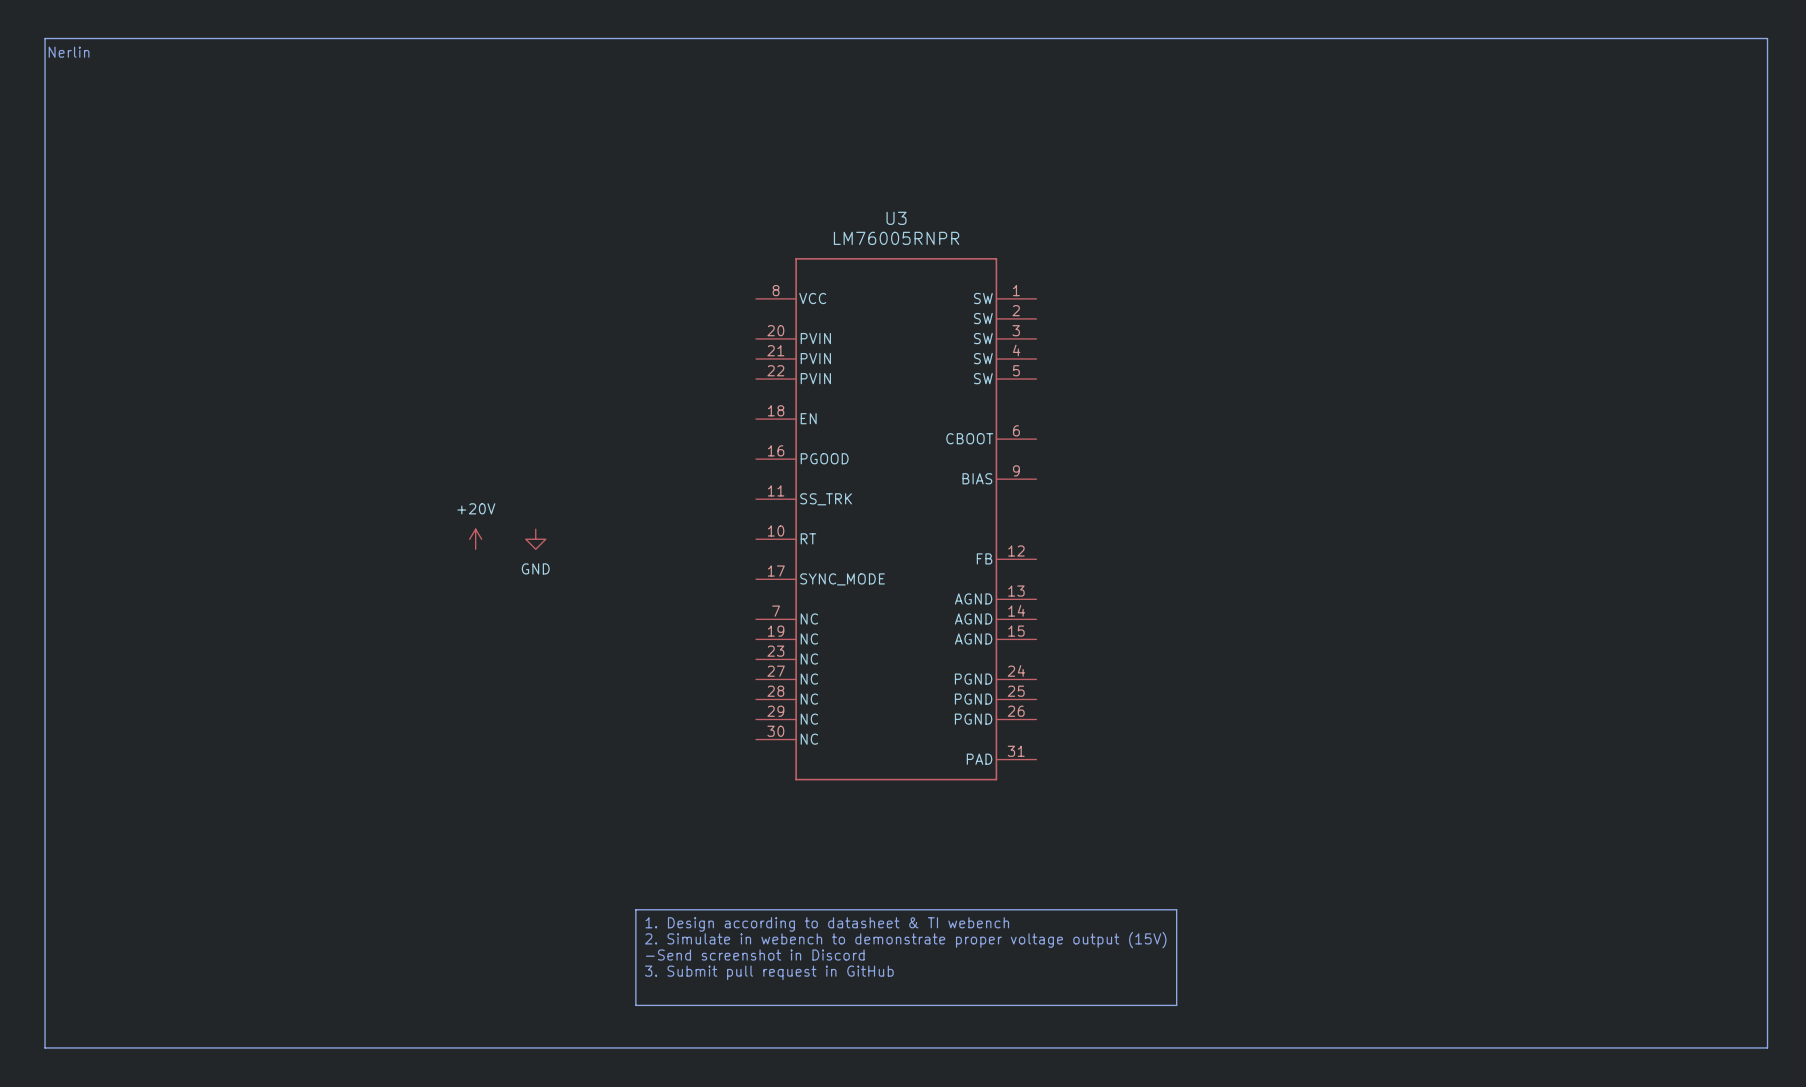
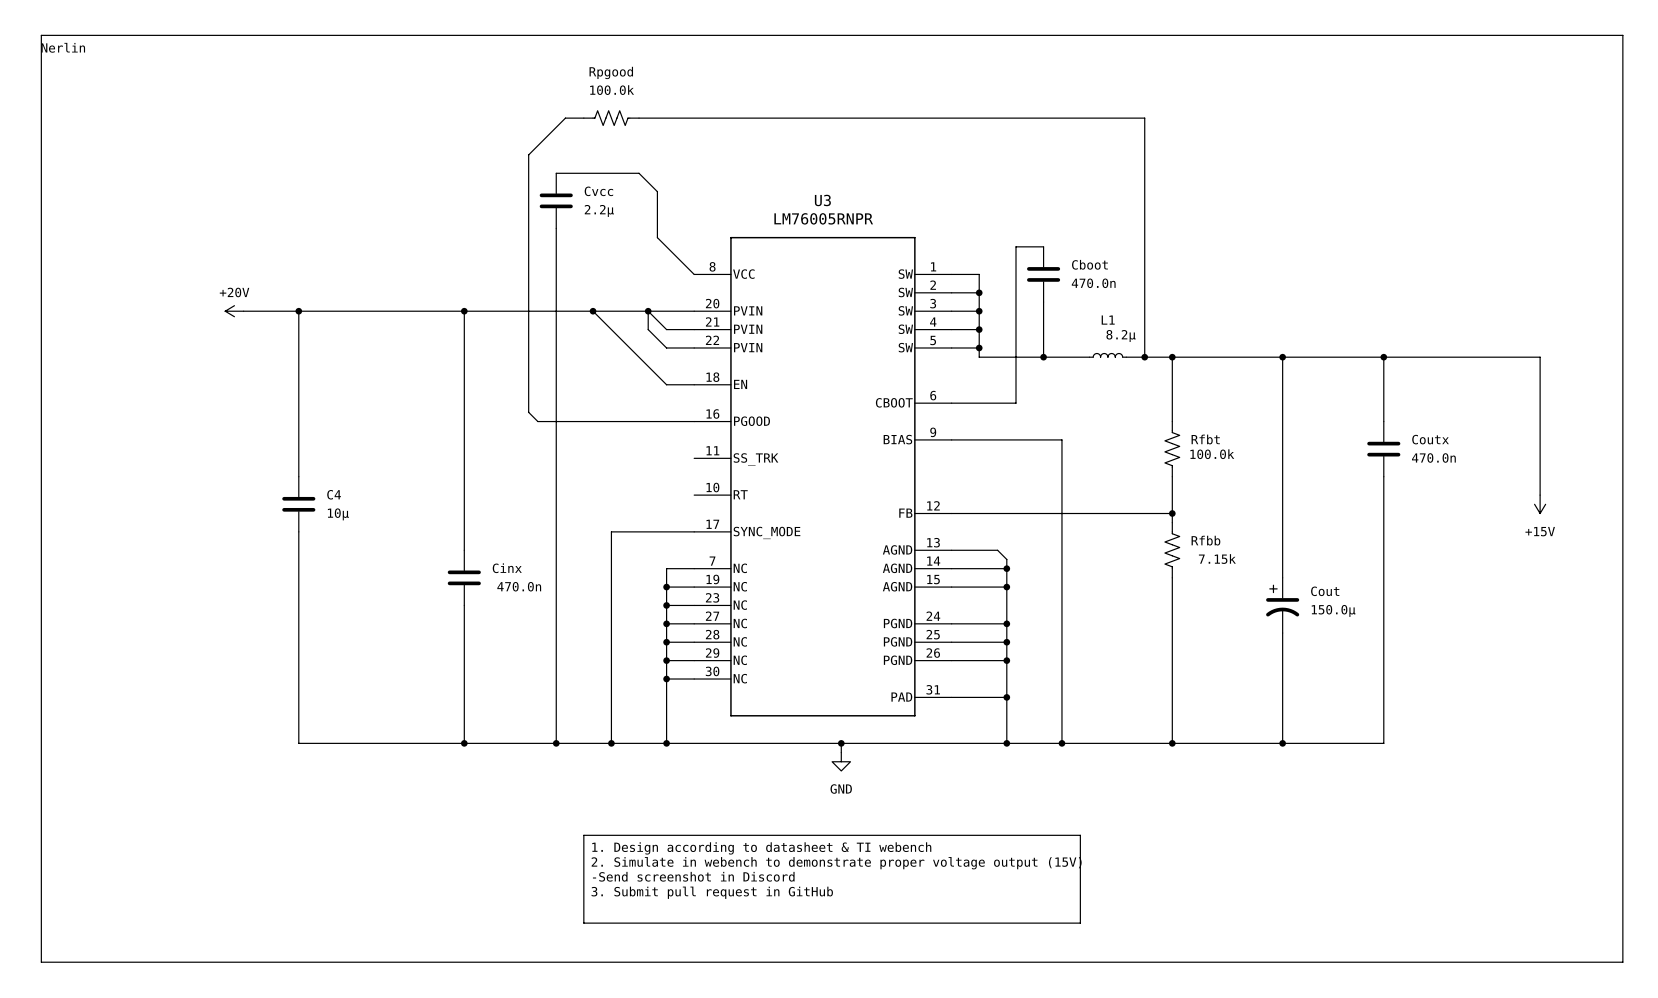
wire: none -> (583, 118) (565, 118) (528, 154) (528, 412) (537, 421) (694, 421)
Rpgood: none -> 100.0k (611, 118)
wire: none -> (639, 118) (1144, 118) (1144, 357)
wire: none -> (556, 173) (639, 173) (657, 191) (657, 237) (694, 274)
Cvcc: none -> 2.2μ (556, 200)
wire: none -> (556, 228) (556, 743)
wire: none -> (1043, 246) (1016, 246) (1016, 403) (951, 403)
wire: none -> (951, 274) (979, 274) (979, 357) (1089, 357)
Cboot: none -> 470.0n (1043, 274)
wire: none -> (951, 292) (979, 292)
junction: none -> (979, 292)
wire: none -> (1043, 302) (1043, 357)
power symbol: none -> +20V (234, 311)
wire: none -> (243, 311) (694, 311)
wire: none -> (298, 311) (298, 476)
junction: none -> (298, 311)
wire: none -> (464, 311) (464, 550)
junction: none -> (464, 311)
wire: none -> (593, 311) (666, 384) (694, 384)
junction: none -> (593, 311)
junction: none -> (648, 311)
wire: none -> (951, 311) (979, 311)
junction: none -> (979, 311)
wire: none -> (694, 329) (666, 329) (648, 311) (648, 329) (666, 347) (694, 347)
wire: none -> (951, 329) (979, 329)
junction: none -> (979, 329)
wire: none -> (951, 347) (979, 347)
junction: none -> (979, 347)
L1: none -> 8.2μ (1107, 355)
junction: none -> (1043, 357)
wire: none -> (1126, 357) (1540, 357) (1540, 495)
junction: none -> (1144, 357)
wire: none -> (1172, 357) (1172, 421)
junction: none -> (1172, 357)
wire: none -> (1282, 357) (1282, 577)
junction: none -> (1282, 357)
wire: none -> (1383, 357) (1383, 421)
junction: none -> (1383, 357)
wire: none -> (951, 439) (1061, 439) (1061, 743)
Rfbt: none -> 100.0k (1172, 449)
Coutx: none -> 470.0n (1383, 449)
wire: none -> (1172, 476) (1172, 522)
wire: none -> (1383, 476) (1383, 743) (298, 743) (298, 531)
power symbol: +20V (475, 539) -> none
power symbol: GND (535, 539) -> none
C4: none -> 10µ (298, 504)
power symbol: none -> +15V (1540, 504)
wire: none -> (951, 513) (1172, 513)
junction: none -> (1172, 513)
wire: none -> (694, 531) (611, 531) (611, 743)
wire: none -> (951, 550) (997, 550) (1006, 559) (1006, 743)
Rfbb: none -> 7.15k (1172, 550)
wire: none -> (694, 568) (666, 568) (666, 743)
wire: none -> (951, 568) (1006, 568)
junction: none -> (1006, 568)
Cinx: none -> 470.0n (464, 577)
wire: none -> (1172, 577) (1172, 743)
wire: none -> (666, 587) (694, 587)
junction: none -> (666, 587)
wire: none -> (951, 587) (1006, 587)
junction: none -> (1006, 587)
wire: none -> (464, 605) (464, 743)
wire: none -> (666, 605) (694, 605)
junction: none -> (666, 605)
Cout: none -> 150.0μ (1282, 605)
wire: none -> (666, 623) (694, 623)
junction: none -> (666, 623)
wire: none -> (951, 623) (1006, 623)
junction: none -> (1006, 623)
wire: none -> (1282, 633) (1282, 743)
wire: none -> (666, 642) (694, 642)
junction: none -> (666, 642)
wire: none -> (951, 642) (1006, 642)
junction: none -> (1006, 642)
wire: none -> (666, 660) (694, 660)
junction: none -> (666, 660)
wire: none -> (951, 660) (1006, 660)
junction: none -> (1006, 660)
wire: none -> (666, 679) (694, 679)
junction: none -> (666, 679)
wire: none -> (951, 697) (1006, 697)
junction: none -> (1006, 697)
junction: none -> (464, 743)
junction: none -> (556, 743)
junction: none -> (611, 743)
junction: none -> (666, 743)
wire: none -> (841, 743) (841, 752)
junction: none -> (841, 743)
junction: none -> (1006, 743)
junction: none -> (1061, 743)
junction: none -> (1172, 743)
junction: none -> (1282, 743)
power symbol: none -> GND (841, 761)

